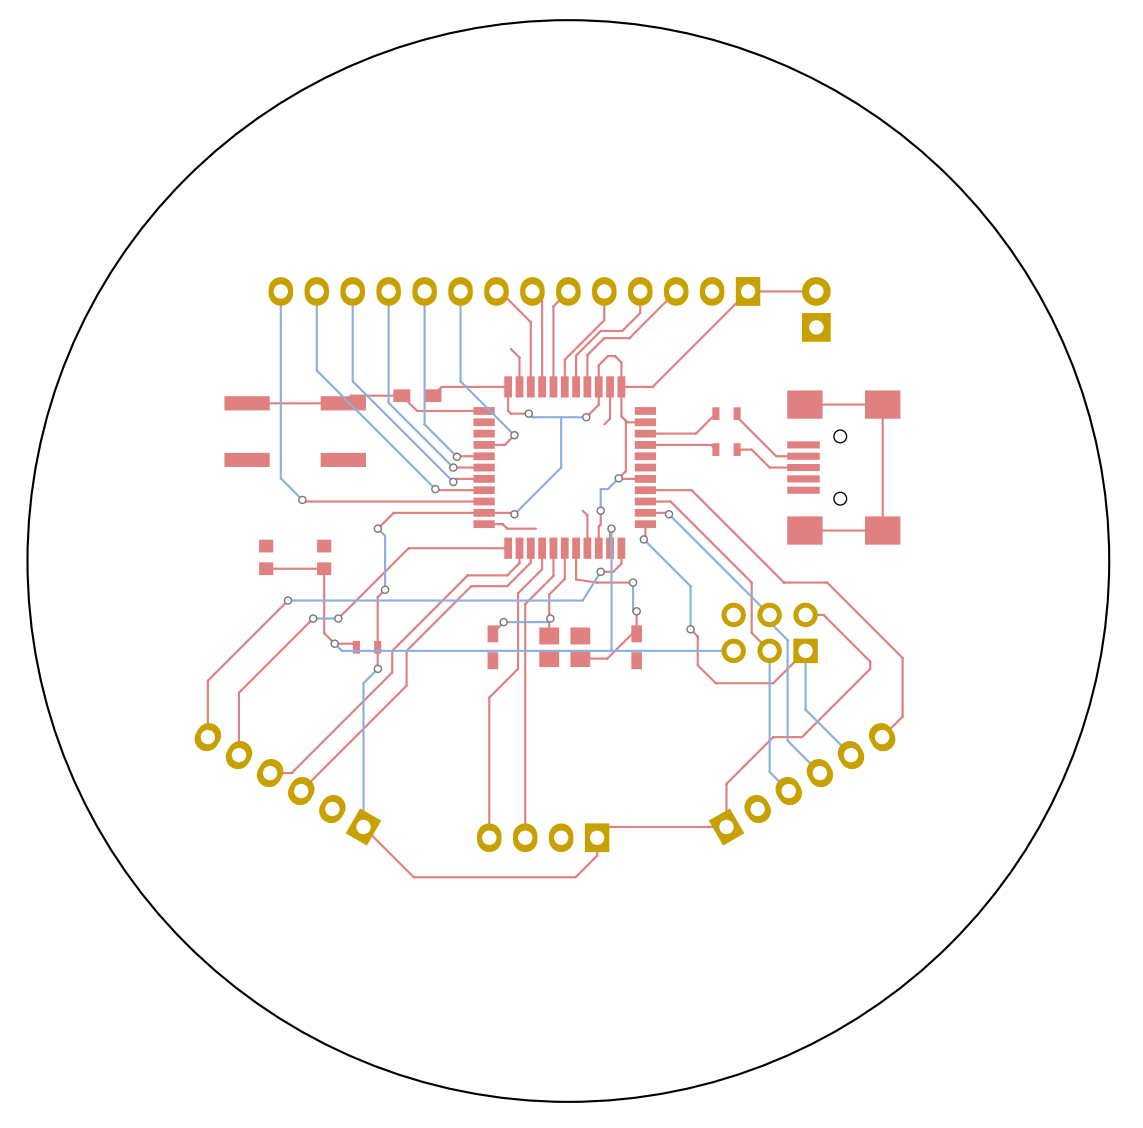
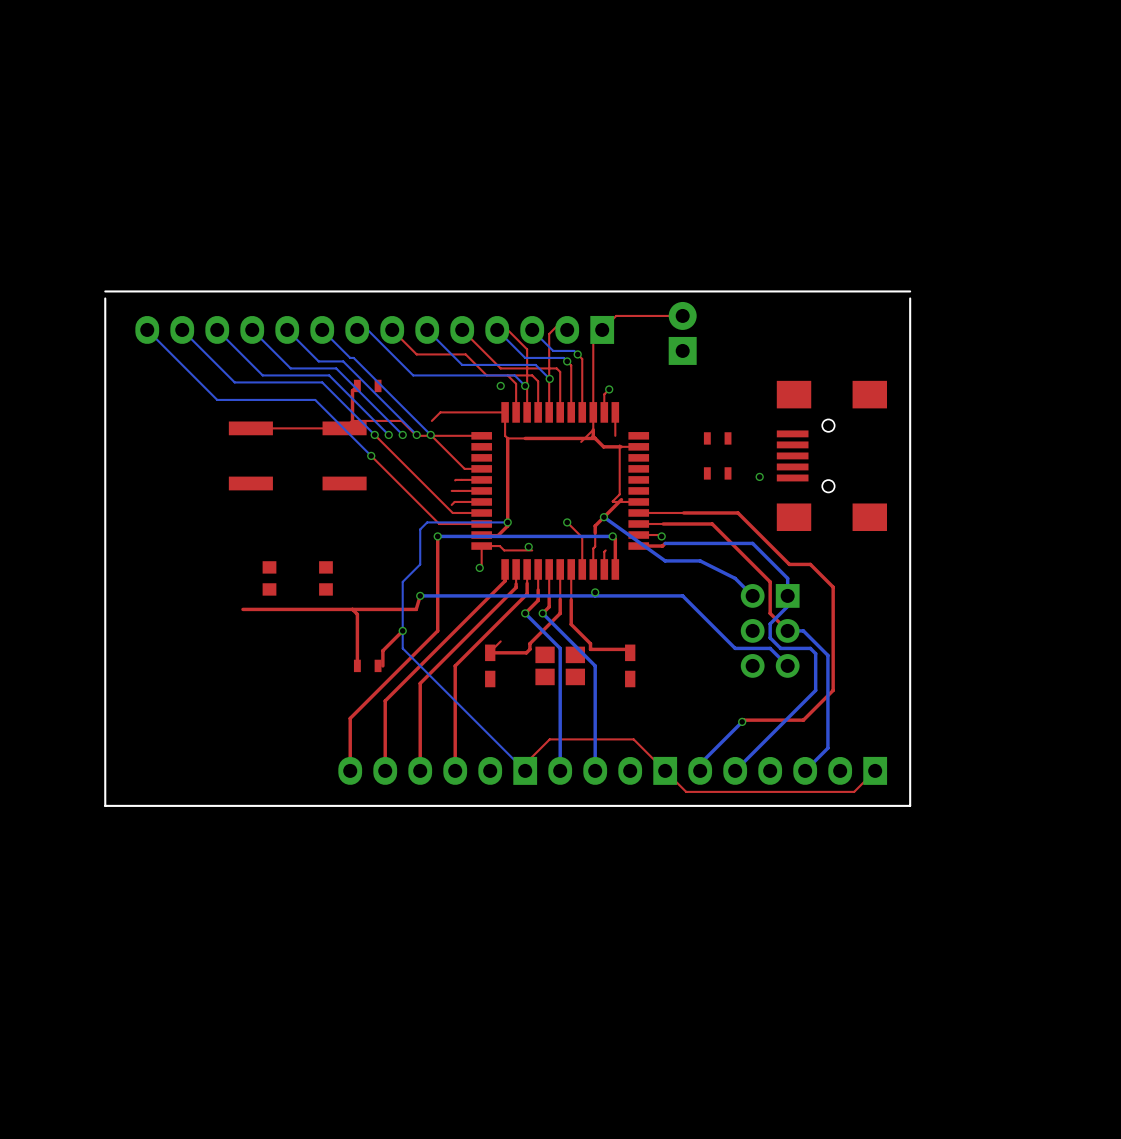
round board edge: [26, 19, 1111, 1103] -> none
board edge: none -> (910, 291) (105, 291)
board edge: none -> (910, 298) (910, 805) (105, 805) (105, 298)
bottom track: (280, 291) (280, 478) (302, 499) -> none
bottom track: (316, 291) (316, 370) (435, 489) -> none
bottom track: (352, 291) (352, 381) (453, 481) -> none
bottom track: (388, 291) (388, 402) (453, 467) -> none
bottom track: (424, 291) (424, 424) (456, 456) -> none
bottom track: (460, 291) (460, 381) (514, 435) -> none
part position: (514, 291) -> (374, 329)
top track: (532, 291) (542, 301) (542, 355) -> (392, 329) (416, 354) (465, 354) (486, 375) (532, 375) (538, 381)
top track: (604, 291) (604, 320) (564, 359) -> (462, 329) (500, 368) (556, 368) (560, 371) (560, 385)
top track: (640, 291) (640, 313) (622, 330) (600, 330) (576, 355) -> (567, 361) (571, 365) (571, 381)
top track: (676, 291) (629, 338) (604, 338) (587, 355) -> (577, 354) (582, 358) (582, 381)
top track: (816, 291) (748, 291) (652, 386) (621, 386) (621, 362) (615, 356) (607, 356) (598, 365) -> (682, 315) (616, 315) (593, 338) (593, 391)
bottom track: none -> (147, 329) (217, 399) (315, 399) (371, 455)
bottom track: none -> (182, 329) (234, 382) (322, 382) (374, 434)
bottom track: none -> (217, 329) (262, 375) (329, 375) (388, 434)
bottom track: none -> (252, 329) (290, 368) (336, 368) (402, 434)
bottom track: none -> (287, 329) (318, 361) (343, 361) (416, 434)
bottom track: none -> (322, 329) (350, 357) (353, 357) (430, 434)
bottom track: none -> (357, 329) (367, 329) (413, 375) (514, 375) (525, 385)
bottom track: none -> (427, 329) (462, 364) (535, 364) (549, 378)
bottom track: none -> (497, 329) (525, 357) (563, 357) (567, 361)
bottom track: none -> (532, 329) (553, 350) (574, 350) (577, 354)
part position: (816, 309) -> (682, 333)
via: none -> (577, 354)
via: none -> (567, 361)
via: none -> (549, 378)
top track: none -> (357, 385) (352, 390) (352, 424)
part: none -> (367, 385)
via: none -> (500, 385)
via: none -> (525, 385)
via: none -> (609, 389)
top track: (610, 386) (610, 418) (604, 424) -> (604, 412) (604, 394) (609, 389)
part: (417, 395) -> none
top track: (804, 404) (882, 404) (882, 530) (804, 530) -> none
via: none -> (374, 434)
via: none -> (388, 434)
via: none -> (402, 434)
via: none -> (416, 434)
via: none -> (430, 434)
top track: (621, 410) (621, 416) (627, 422) -> (593, 429) (593, 436) (603, 446) (621, 446)
bottom track: (528, 413) (532, 417) (586, 417) -> none
via: (528, 413) -> none
top track: none -> (595, 438) (525, 438)
top track: (715, 413) (695, 433) (645, 433) -> none
top track: (737, 413) (737, 417) (776, 456) (803, 456) -> none
bottom track: (561, 417) (561, 467) (514, 514) -> none
via: (586, 417) -> none
via: none -> (371, 455)
top track: (514, 435) (504, 444) (484, 444) -> (430, 434) (464, 468) (481, 468)
via: (514, 435) -> none
top track: (645, 444) (711, 444) (715, 449) -> none
top track: (737, 449) (751, 449) (769, 467) (803, 467) -> none
via: none -> (759, 476)
via: (456, 456) -> none
via: (453, 467) -> none
part position: (843, 467) -> (831, 455)
top track: none -> (621, 499) (595, 525) (595, 532)
bottom track: (618, 478) (607, 489) (600, 489) (600, 510) -> none
via: (618, 478) -> none
via: (453, 481) -> none
top track: (435, 489) (454, 490) -> (374, 434) (452, 512)
via: (435, 489) -> none
top track: (691, 490) (784, 582) (827, 582) (902, 658) (902, 716) (882, 737) -> (683, 512) (737, 512) (789, 564) (810, 564) (833, 587) (833, 690) (803, 720) (743, 720) (742, 721)
bottom track: none -> (603, 517) (665, 560) (700, 560) (735, 578) (752, 595)
via: none -> (603, 517)
top track: (302, 499) (304, 501) (440, 501) -> (371, 455) (439, 523)
via: (302, 499) -> none
bottom track: none -> (507, 522) (427, 522) (420, 529) (420, 564) (402, 581) (402, 648) (525, 770)
via: none -> (507, 522)
top track: none -> (567, 522) (577, 532)
via: none -> (567, 522)
top track: (670, 501) (751, 582) (751, 632) (769, 650) -> (663, 523) (712, 523) (770, 581) (770, 613) (787, 630)
via: (600, 510) -> none
top track: (484, 512) (393, 512) (377, 528) -> none
top track: (501, 512) (514, 514) -> (498, 535) (507, 525) (507, 438)
top track: none -> (437, 536) (437, 630) (350, 718) (350, 770)
via: none -> (437, 536)
via: (514, 514) -> none
bottom track: none -> (612, 536) (437, 536)
via: none -> (612, 536)
bottom track: (668, 514) (769, 614) (769, 622) (787, 640) (787, 740) (819, 773) -> none
bottom track: none -> (665, 543) (752, 543) (787, 578) (787, 606) (770, 623) (770, 637) (780, 648) (810, 648) (815, 653) (815, 690) (735, 770)
top track: none -> (481, 546) (481, 565) (479, 567)
top track: (645, 524) (643, 539) -> (638, 546) (662, 546) (665, 543)
via: none -> (528, 546)
bottom track: (377, 528) (385, 535) (385, 589) -> none
via: (377, 528) -> none
bottom track: (611, 528) (611, 650) -> none
via: (611, 528) -> none
bottom track: (643, 539) (690, 586) (690, 629) -> none
via: (643, 539) -> none
via: none -> (479, 567)
top track: (508, 548) (408, 548) (338, 618) -> (505, 569) (505, 581) (385, 700) (385, 770)
top track: (621, 548) (621, 563) (613, 571) (600, 571) -> (615, 569) (615, 539) (612, 536)
top track: (530, 562) (507, 586) (471, 586) (406, 650) (406, 685) (301, 791) -> (527, 583) (527, 593) (455, 665) (455, 770)
top track: (519, 563) (507, 575) (467, 575) (392, 650) (392, 672) (291, 773) (270, 773) -> (516, 584) (516, 587) (420, 683) (420, 770)
top track: (266, 568) (324, 568) (324, 633) (334, 643) (352, 643) (356, 647) -> (352, 609) (357, 614) (357, 665)
top track: (542, 569) (518, 593) (518, 668) (489, 697) (489, 837) -> (538, 589) (538, 600) (525, 613)
bottom track: (600, 571) (582, 600) (288, 600) -> none
top track: none -> (420, 595) (416, 609) (242, 609)
bottom track: none -> (420, 595) (682, 595) (735, 648) (770, 648) (787, 665)
via: none -> (420, 595)
top track: (553, 575) (525, 604) (525, 837) -> (549, 596) (549, 606) (542, 613)
top track: (564, 578) (549, 594) (549, 635) -> (560, 599) (560, 613) (529, 643) (529, 649) (526, 652) (490, 652)
top track: (576, 579) (597, 582) (633, 582) -> (571, 599) (571, 624) (590, 643) (590, 649) (626, 649) (630, 652)
bottom track: (633, 582) (633, 611) (636, 611) -> none
via: (633, 582) -> none
top track: (385, 589) (377, 597) (377, 668) -> none
via: (385, 589) -> none
bottom track: none -> (525, 613) (560, 648) (560, 770)
via: none -> (525, 613)
bottom track: none -> (542, 613) (595, 665) (595, 770)
via: none -> (542, 613)
top track: (288, 600) (207, 680) (207, 737) -> none
via: (288, 600) -> none
top track: none -> (402, 630) (382, 650) (382, 665)
via: none -> (402, 630)
top track: (636, 611) (636, 633) (632, 633) (607, 658) (580, 658) -> none
via: (636, 611) -> none
bottom track: none -> (787, 630) (803, 630) (827, 655) (827, 748) (805, 770)
top track: (805, 614) (823, 614) (870, 661) (870, 668) (801, 737) (773, 737) (726, 783) (726, 826) (607, 826) (597, 837) (597, 855) (575, 877) (413, 877) (363, 826) -> none
top track: (313, 618) (238, 692) (238, 755) -> none
via: (313, 618) -> none
bottom track: (338, 618) (313, 618) -> none
via: (338, 618) -> none
bottom track: (550, 618) (546, 622) (503, 622) -> none
via: (550, 618) -> none
via: (503, 622) -> none
top track: (690, 629) (697, 636) (697, 665) (715, 683) (773, 683) (805, 650) -> none
via: (690, 629) -> none
part rotation: 0° (769, 632) -> 90° counterclockwise (770, 630)
bottom track: (334, 643) (341, 650) (733, 650) -> none
via: (334, 643) -> none
bottom track: (769, 650) (769, 771) (788, 791) -> none
bottom track: (805, 650) (805, 709) (851, 755) -> none
bottom track: (377, 668) (363, 683) (363, 826) -> none
via: (377, 668) -> none
bottom track: none -> (742, 721) (700, 763) (700, 770)
via: none -> (742, 721)
part: none -> (437, 770)
part: none -> (787, 770)
top track: none -> (875, 770) (854, 791) (686, 791) (633, 739) (549, 739) (525, 763) (525, 770)
part: (287, 784) -> none
part: (802, 784) -> none
part position: (543, 837) -> (612, 770)

